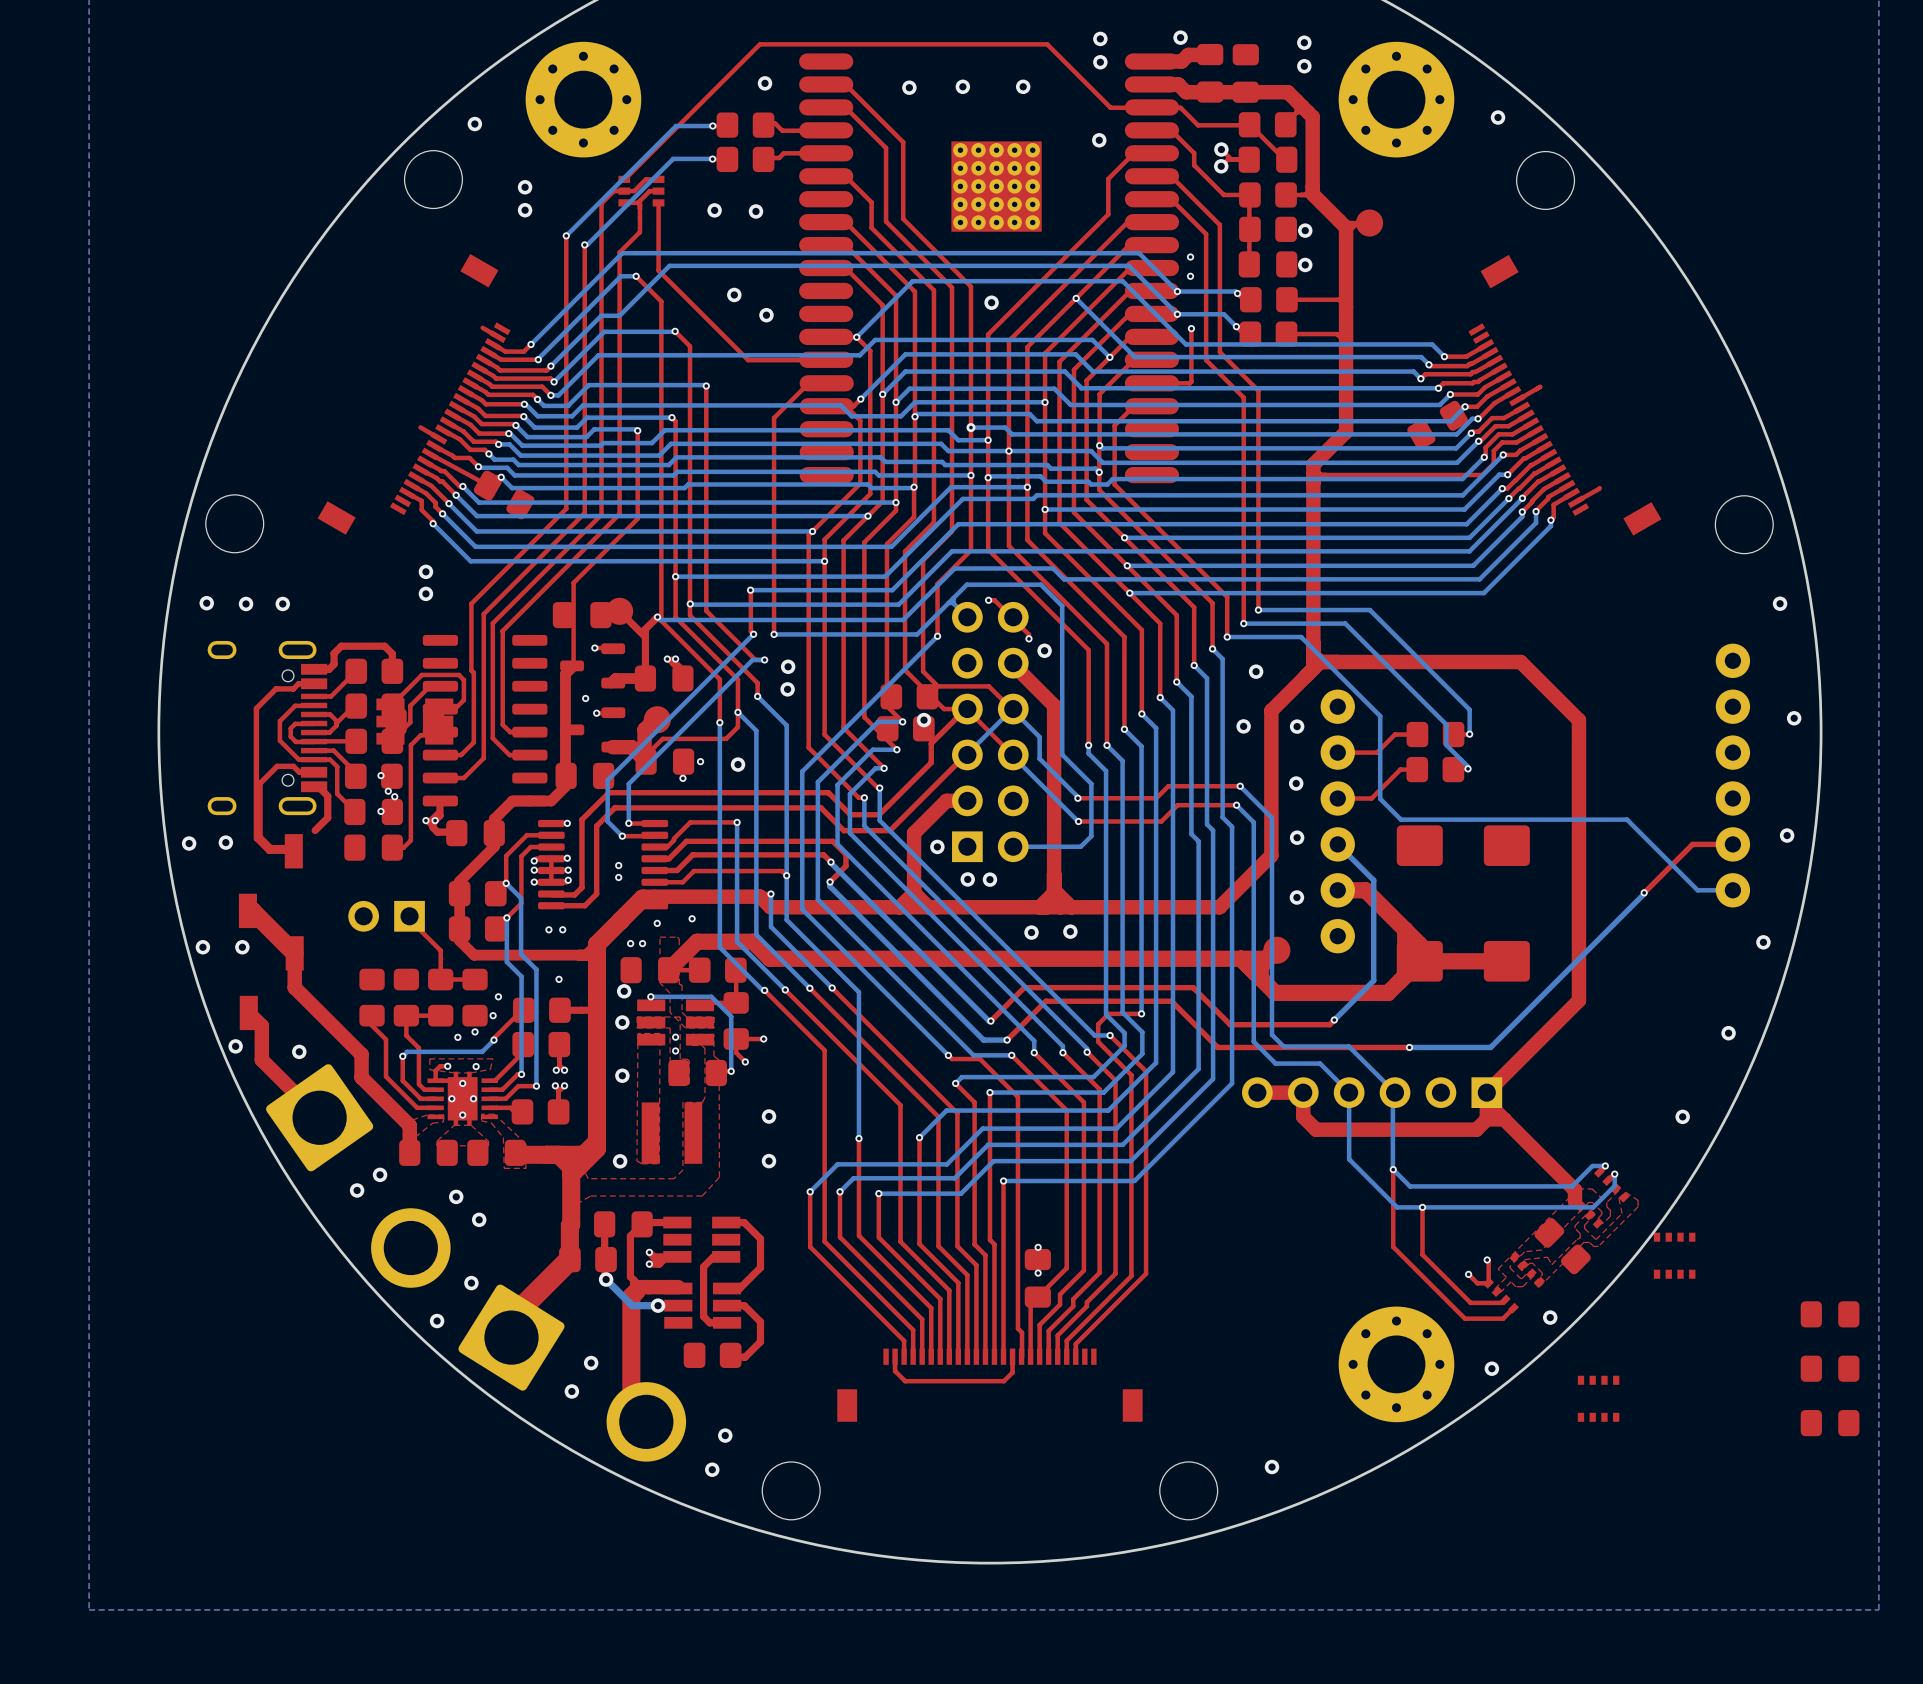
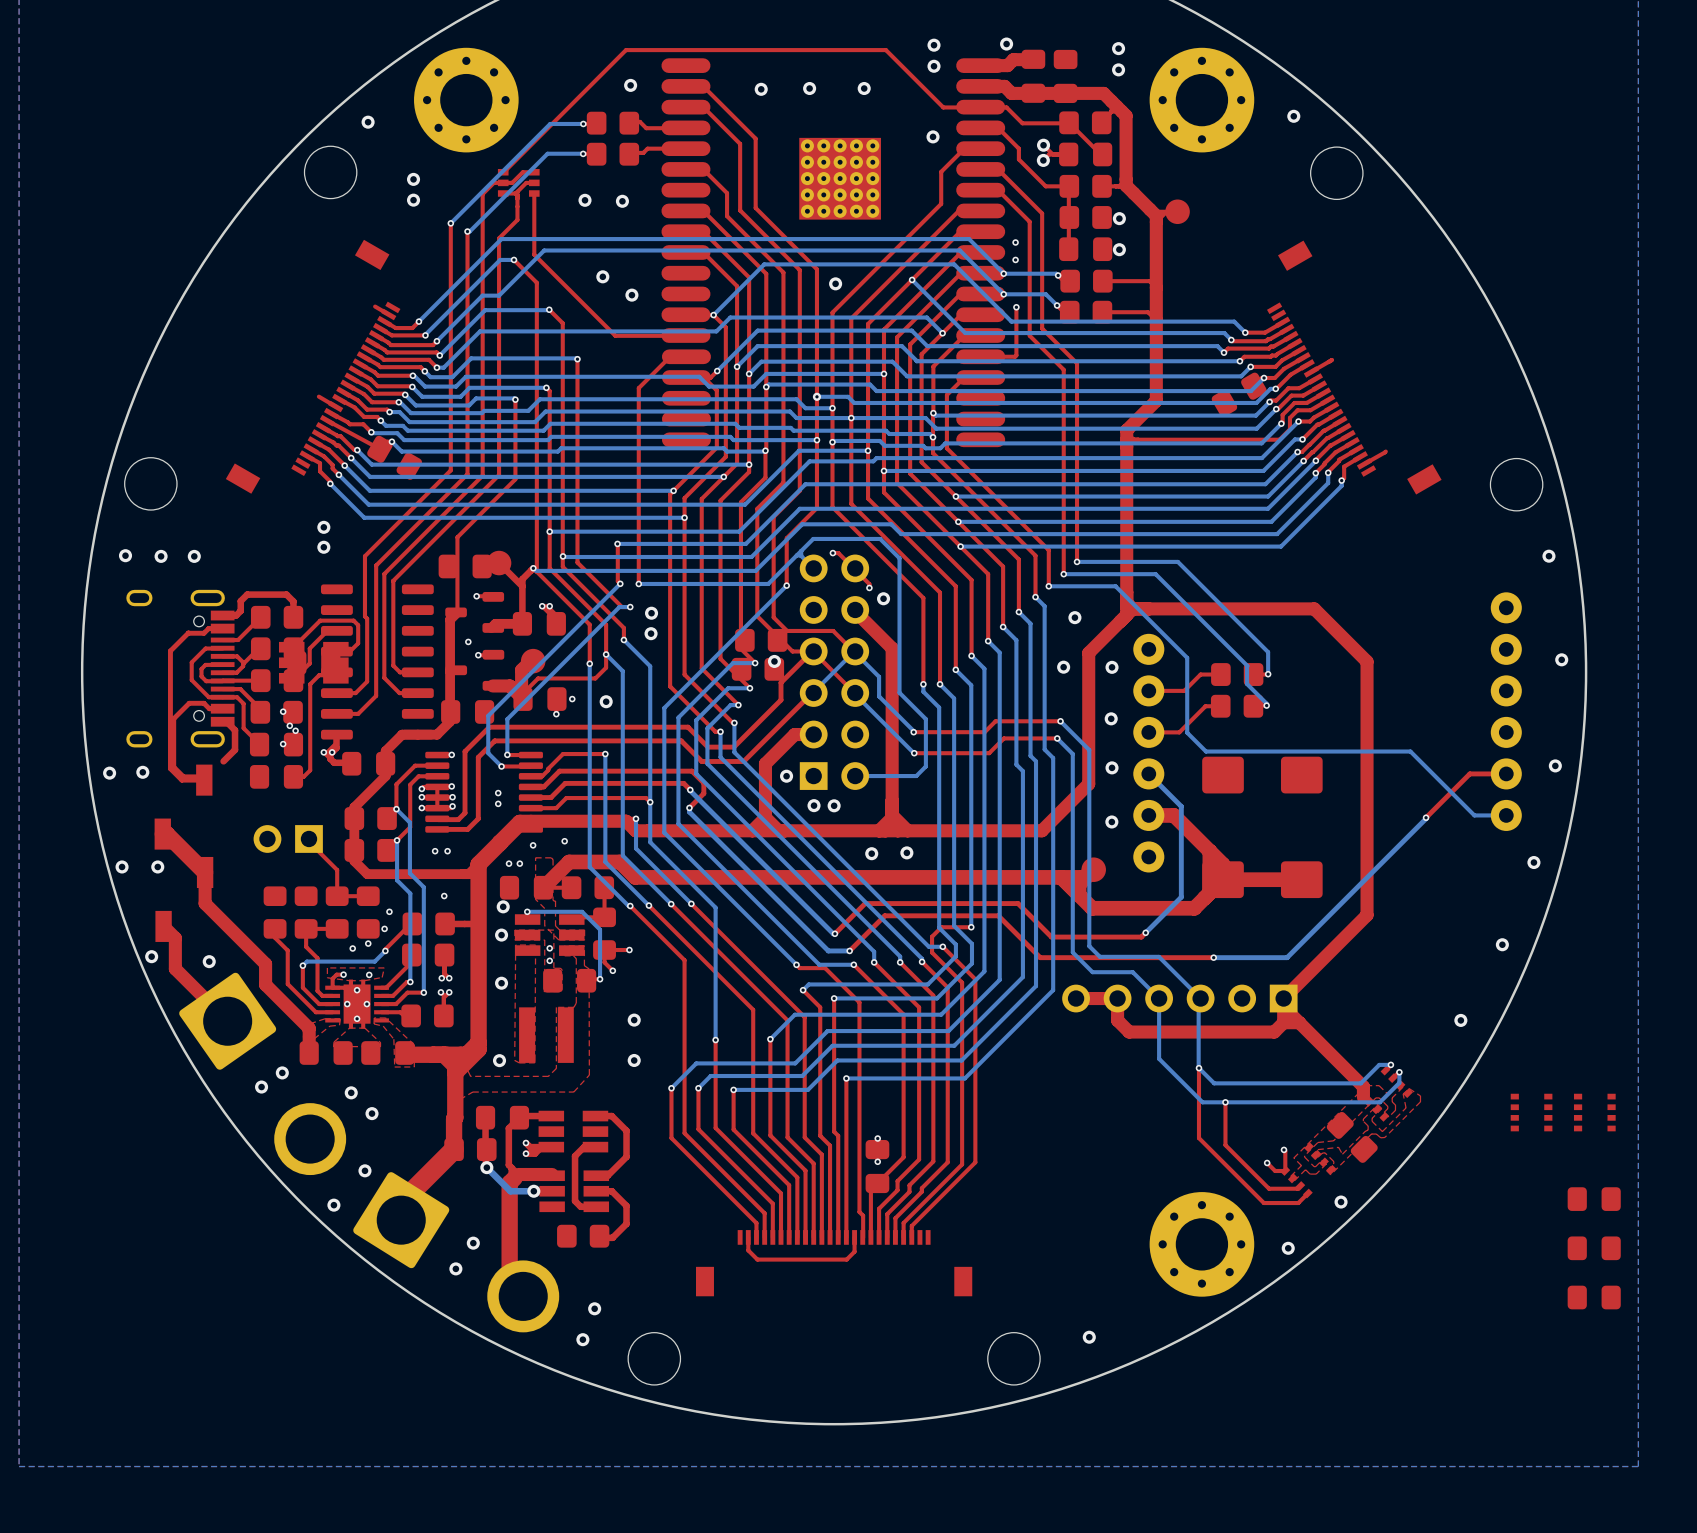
part: none -> (1531, 1112)
part: none -> (1594, 1112)
part: (1674, 1255) -> none
part: (1598, 1398) -> none

